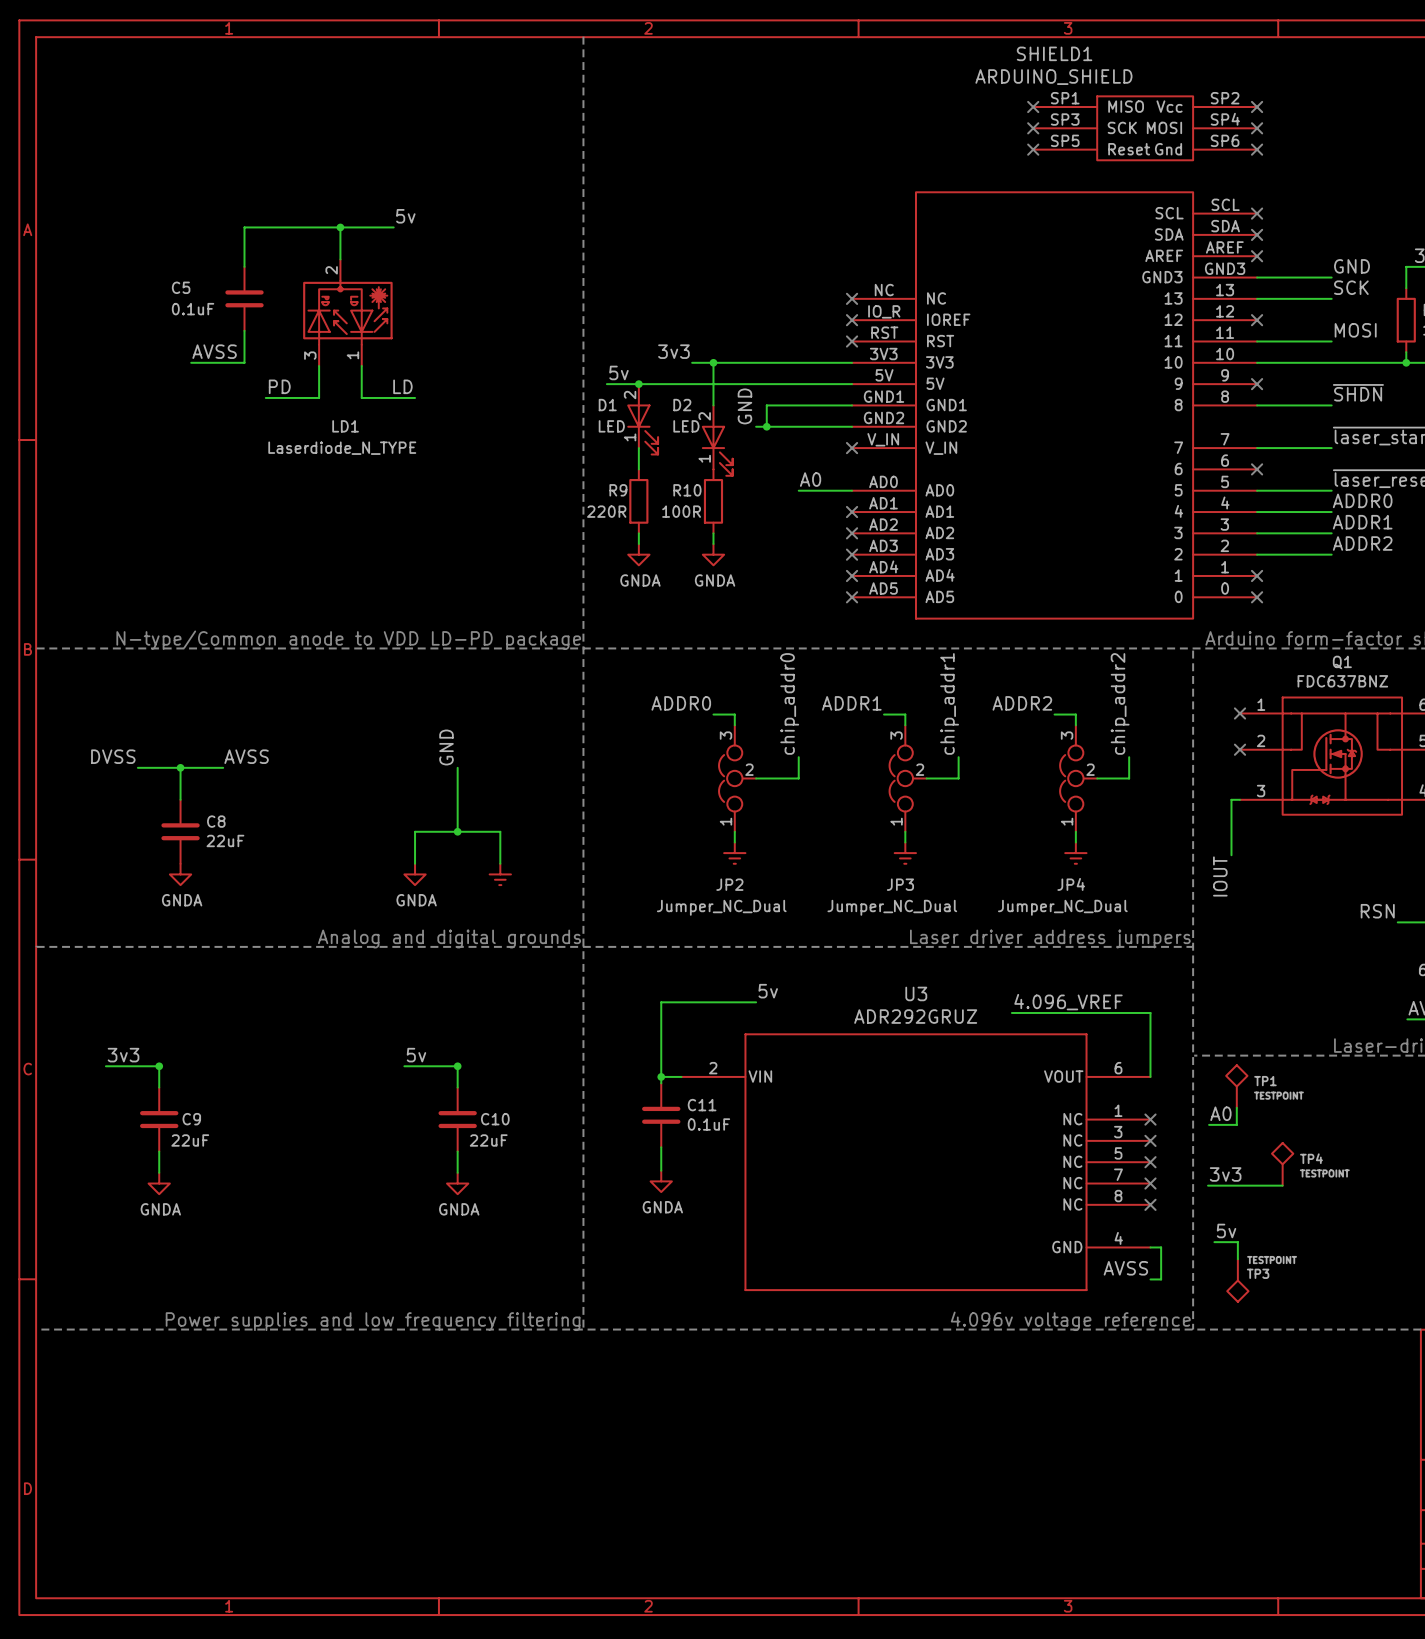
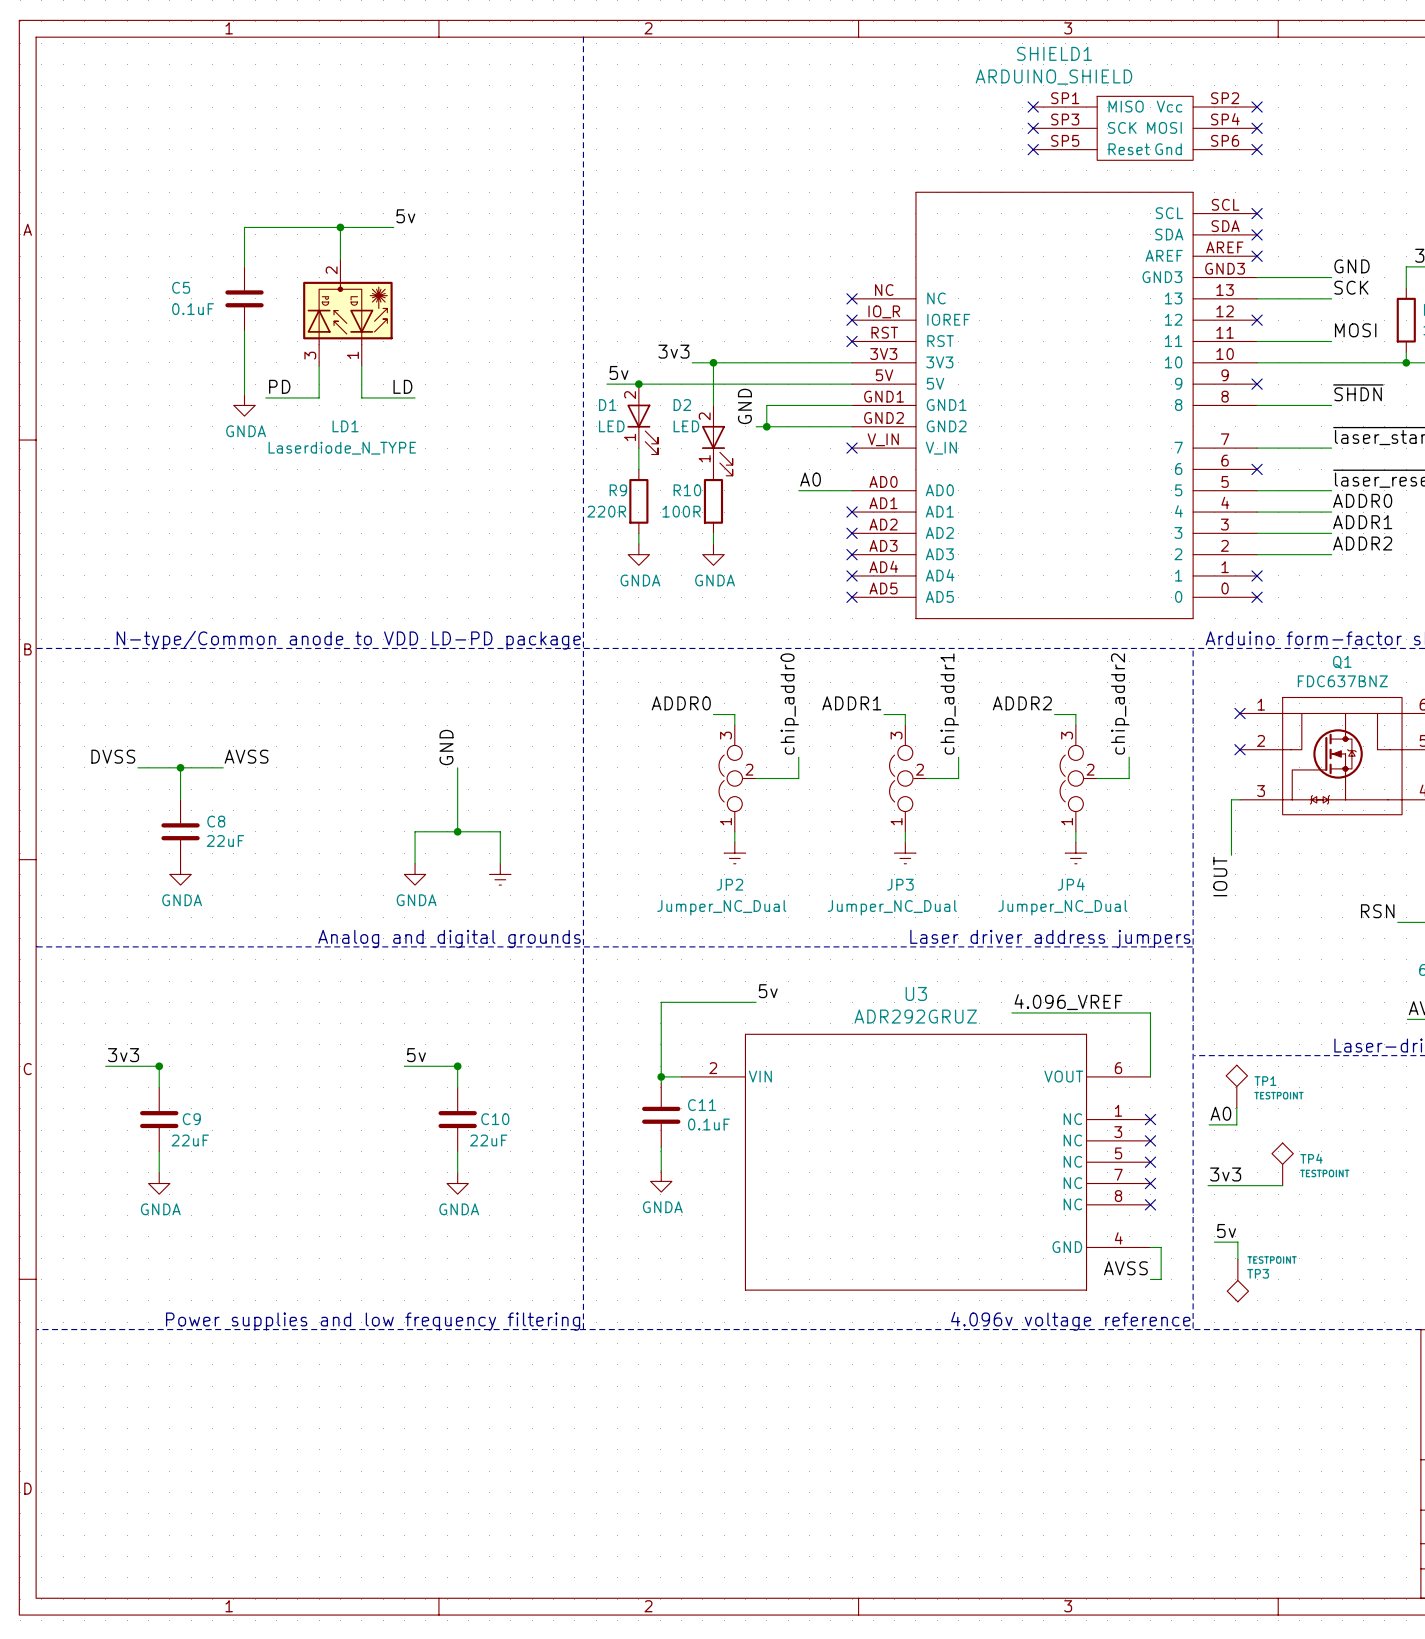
label: AVSS (214, 351) -> none
wire: (191, 362) (244, 362) -> (244, 394) (244, 362)
power symbol: none -> GNDA (244, 405)

